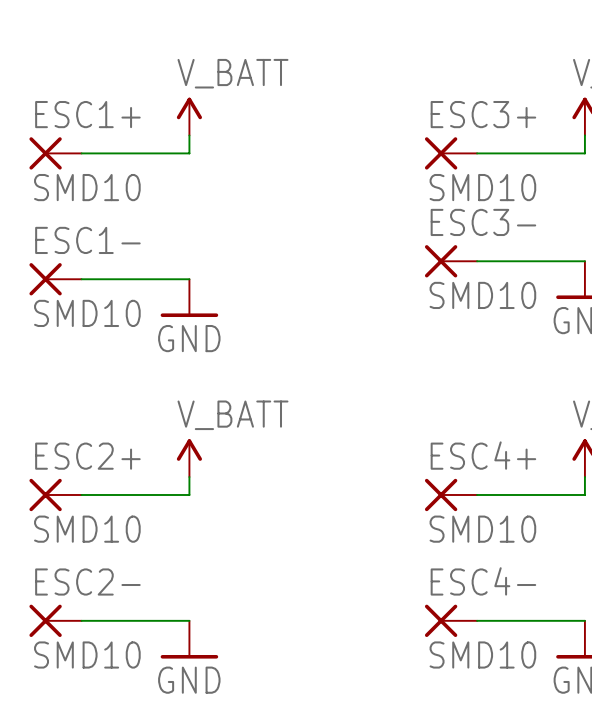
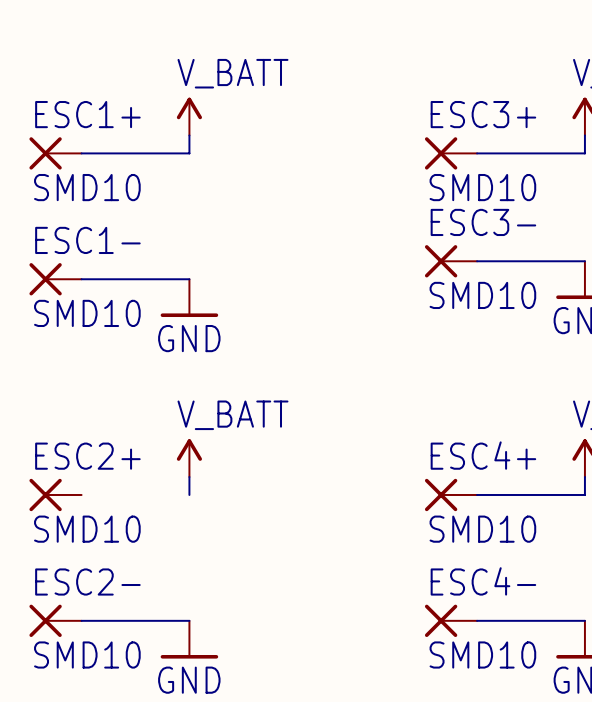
wire: (81, 494) (189, 494) -> none

